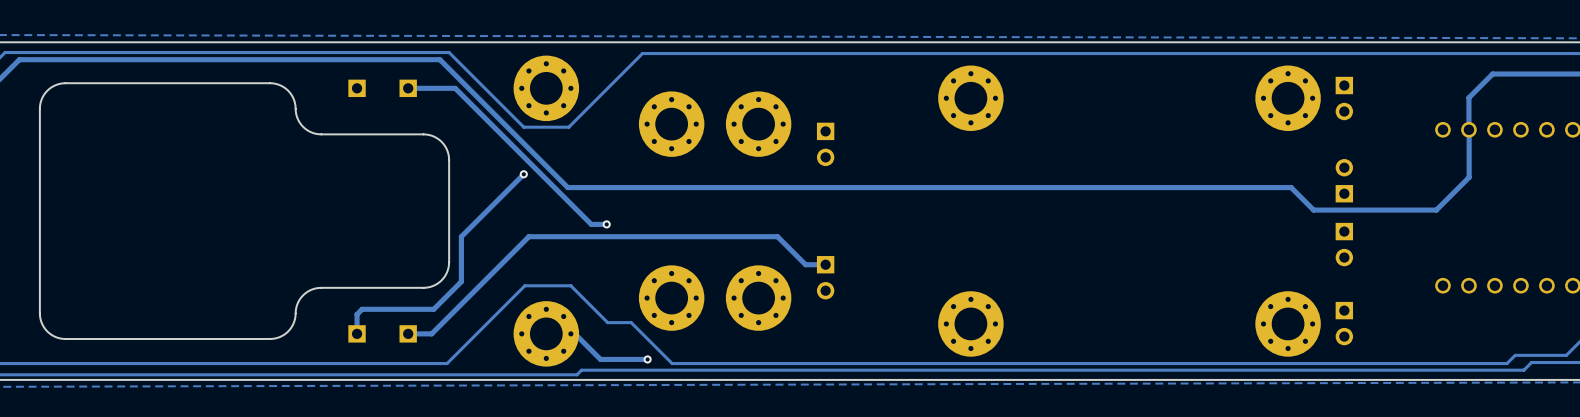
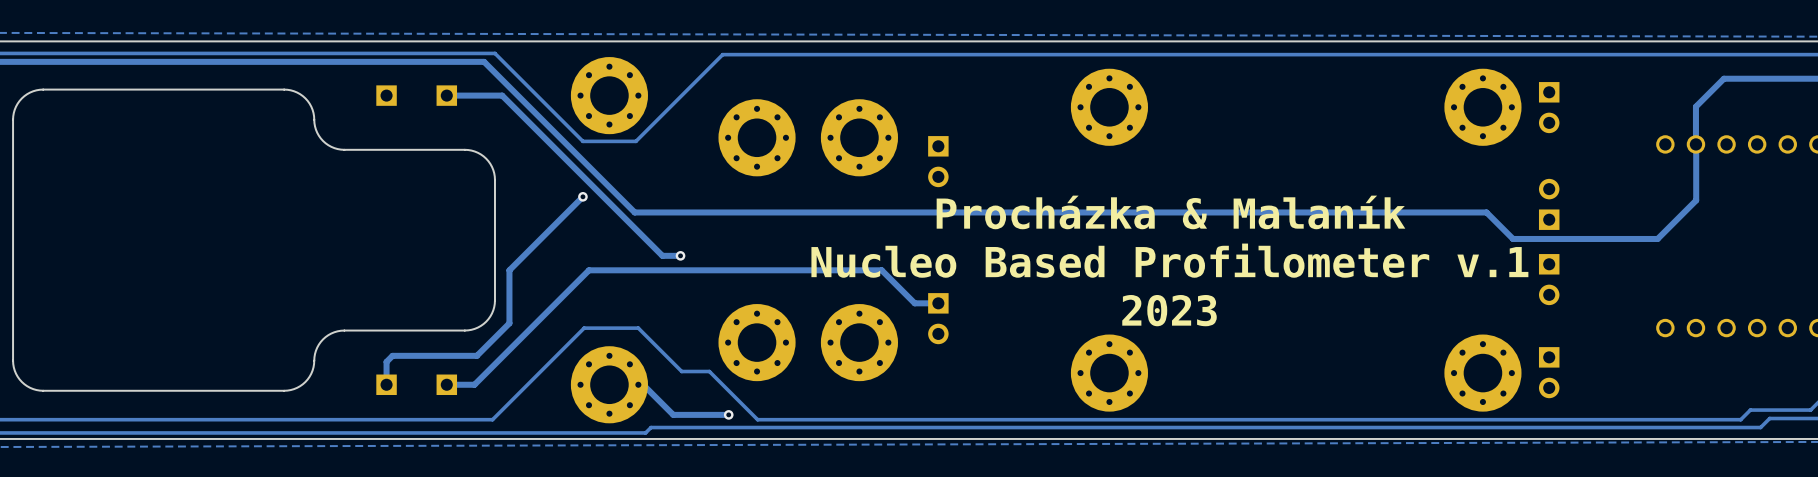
text: none -> Procházka & Malaník (1170, 212)
text: none -> Nucleo Based Profilometer v.1 (1169, 260)
text: none -> 2023 (1169, 310)

